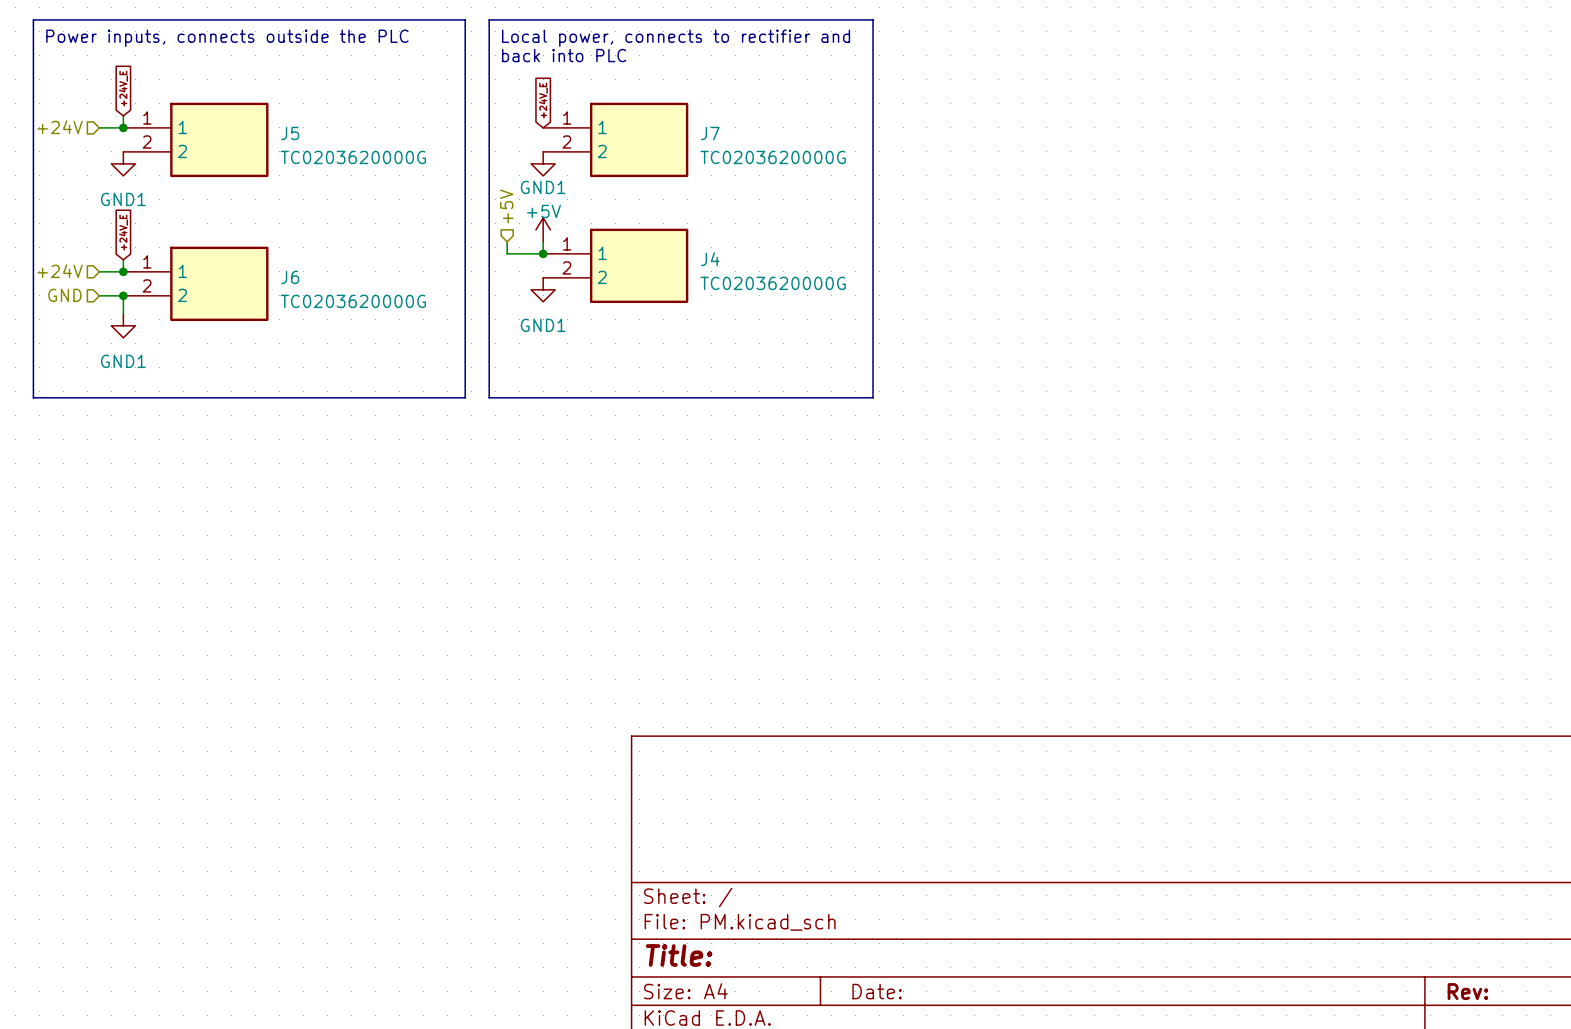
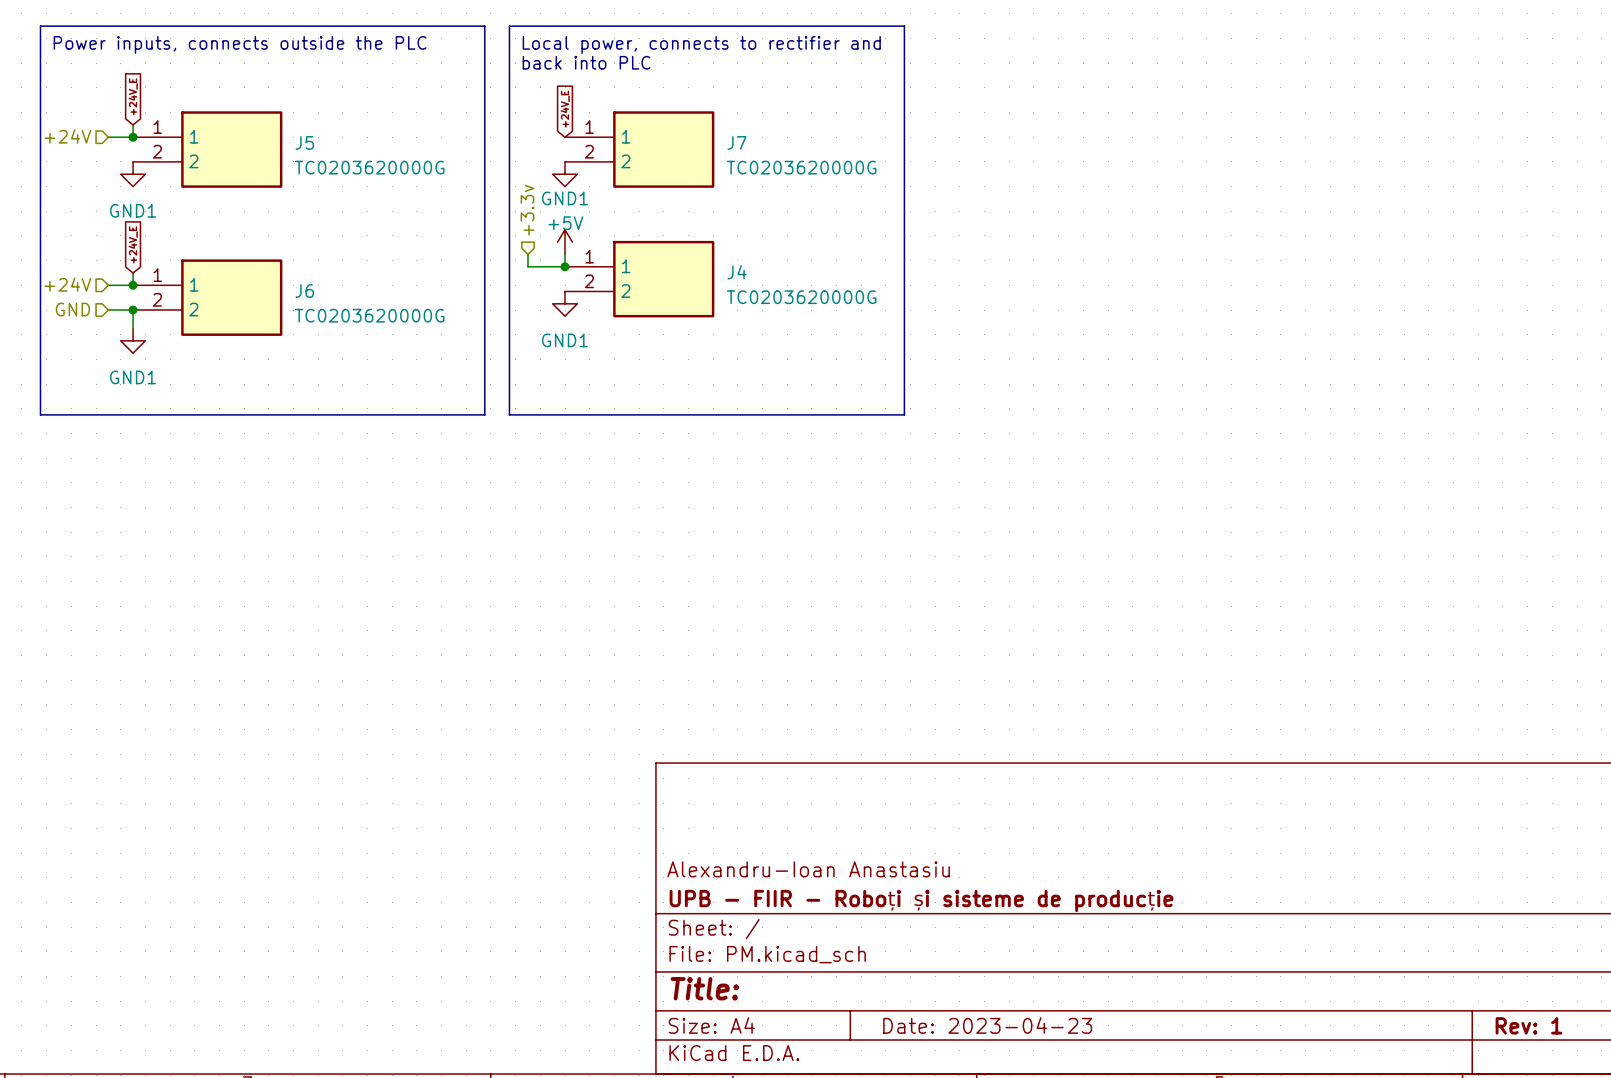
hierarchical label: +5V (506, 206) -> +3.3v (527, 210)
title block: none -> Alexandru-Ioan Anastasiu (808, 869)
title block: none -> UPB - FIIR - Roboți și sisteme de producție (921, 900)
title block: Date: (877, 991) -> Date: 2023-04-23 (987, 1025)
title block: Rev: (1467, 991) -> Rev: 1 (1529, 1025)

